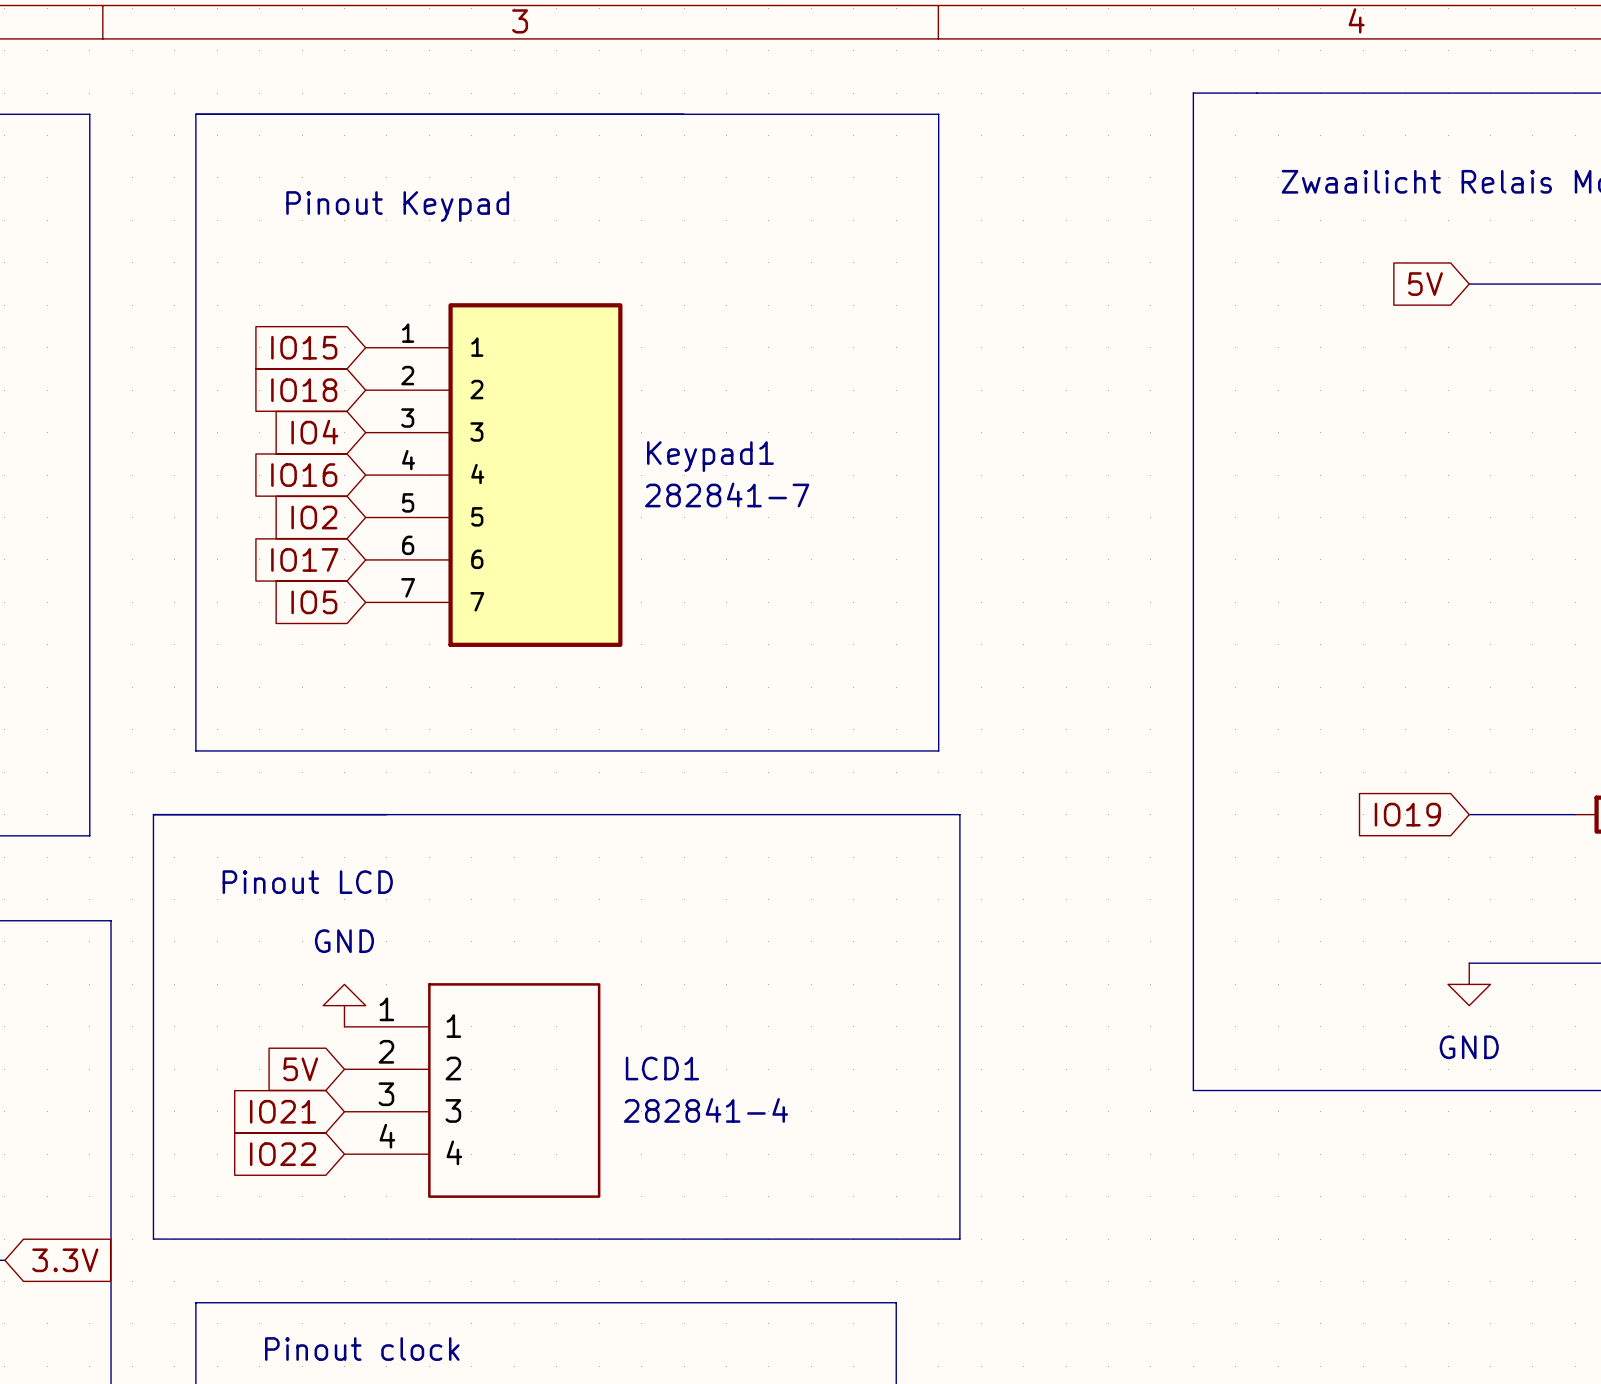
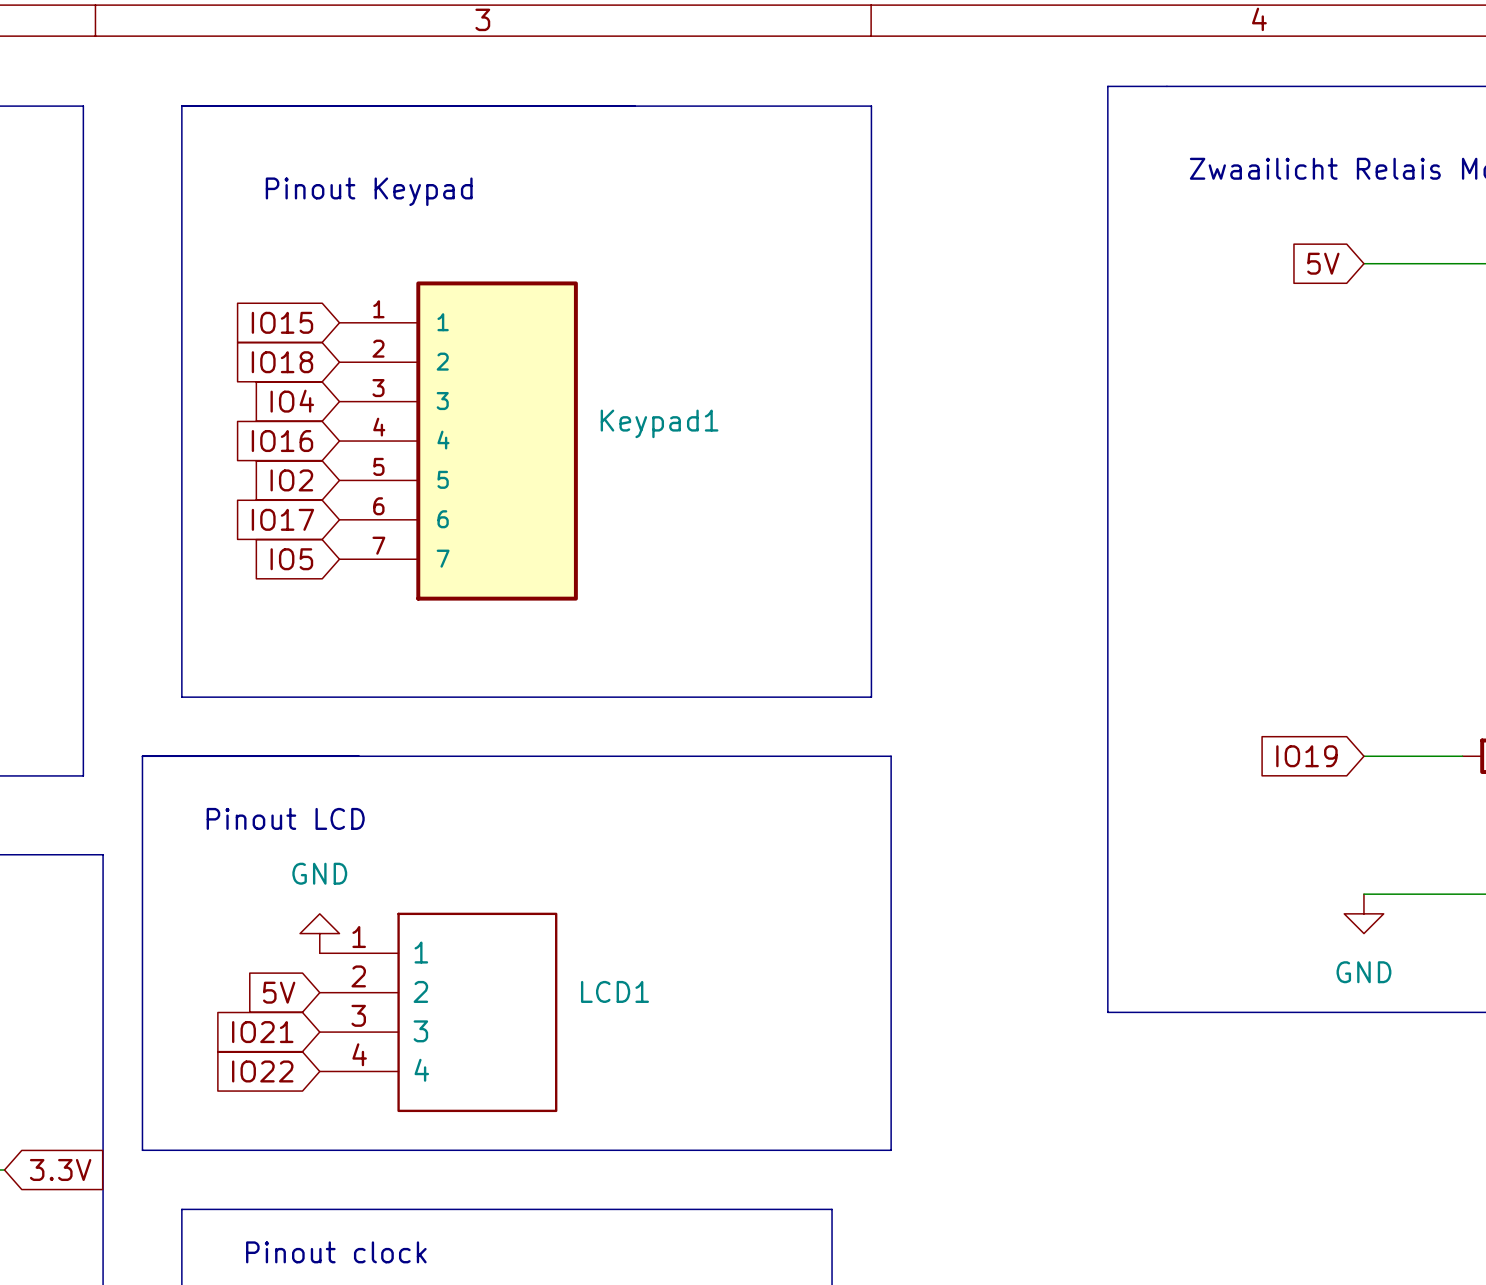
Keypad1 value: 282841-7 (727, 494) -> none
LCD1 value: 282841-4 (705, 1110) -> none

